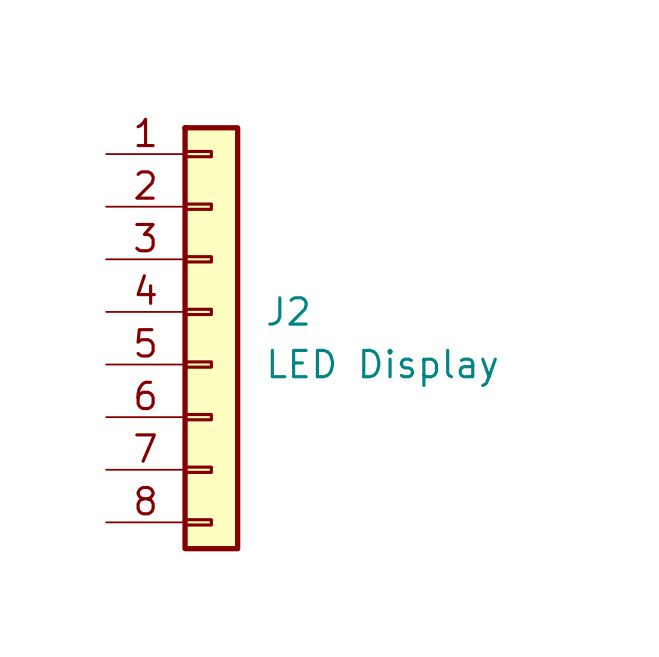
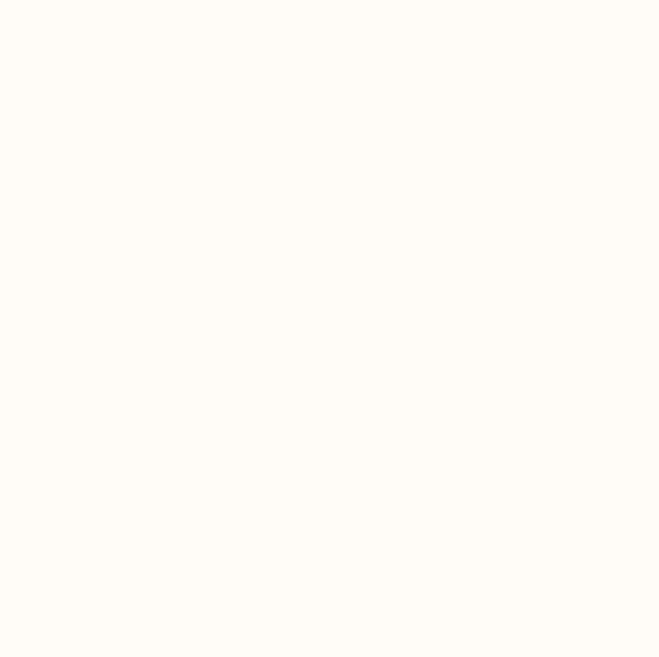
J2: LED Display (173, 338) -> none

